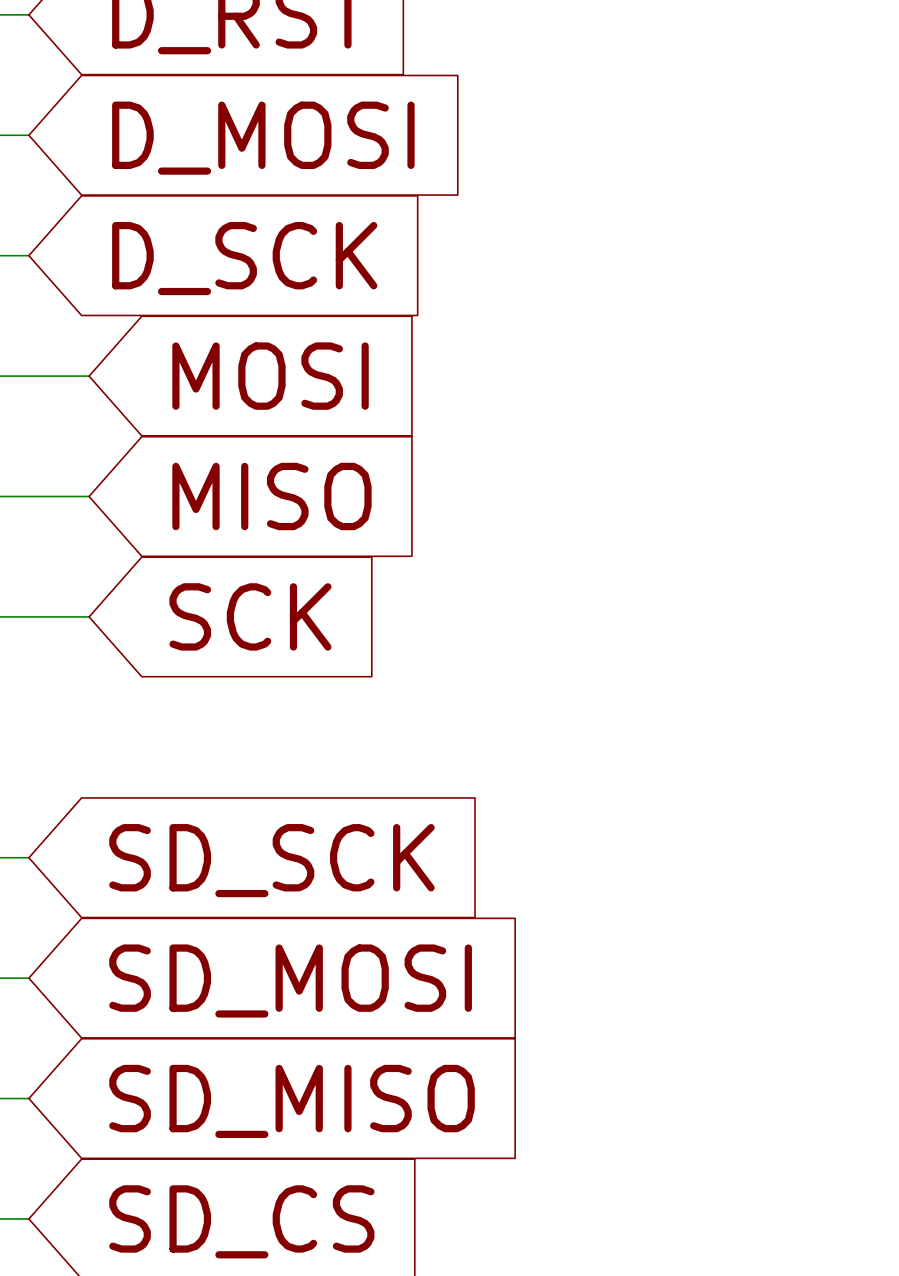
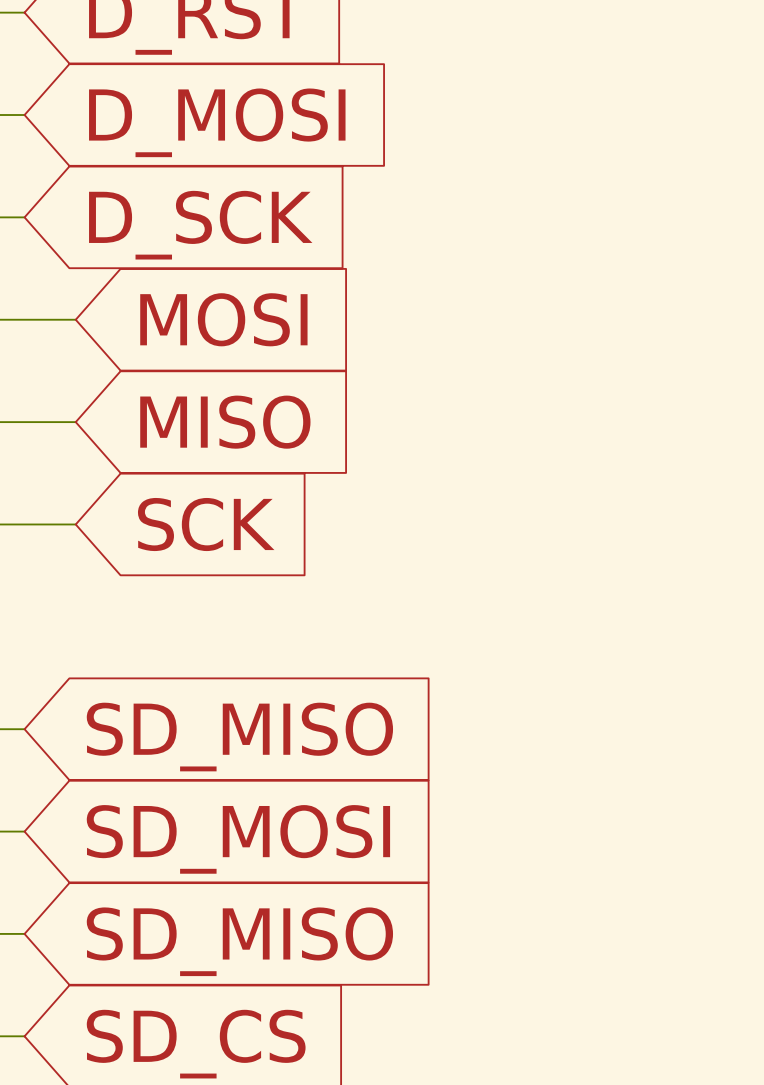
global label: SD_SCK (271, 860) -> SD_MISO (239, 737)

